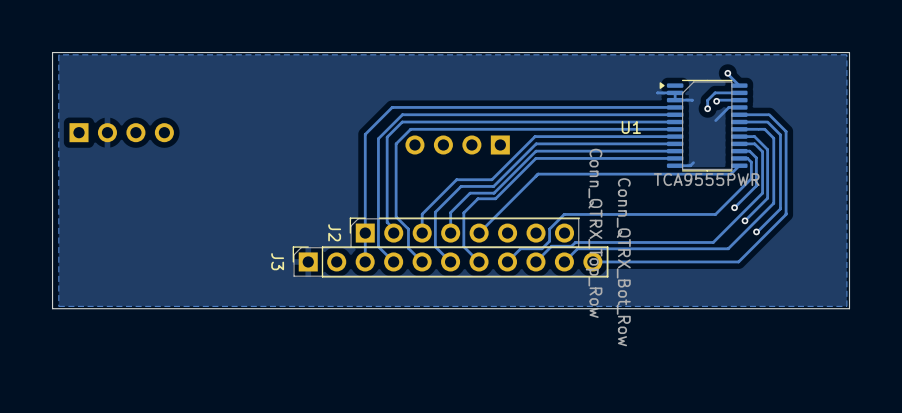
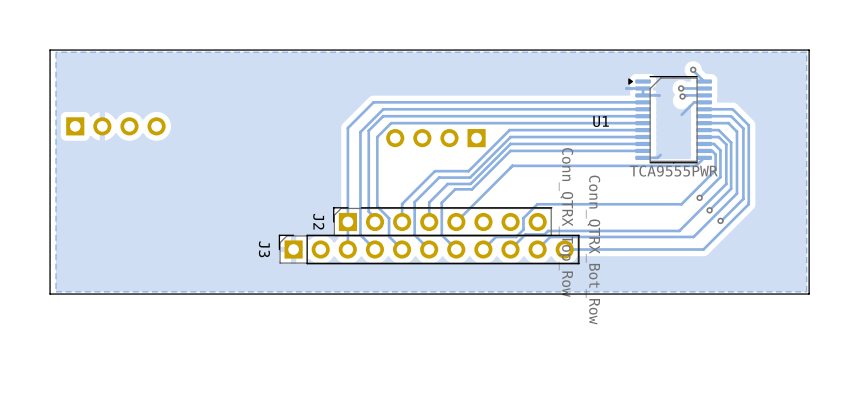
track: (715, 92) (707, 100) (707, 108) -> none
via position: (707, 108) -> (681, 88)

